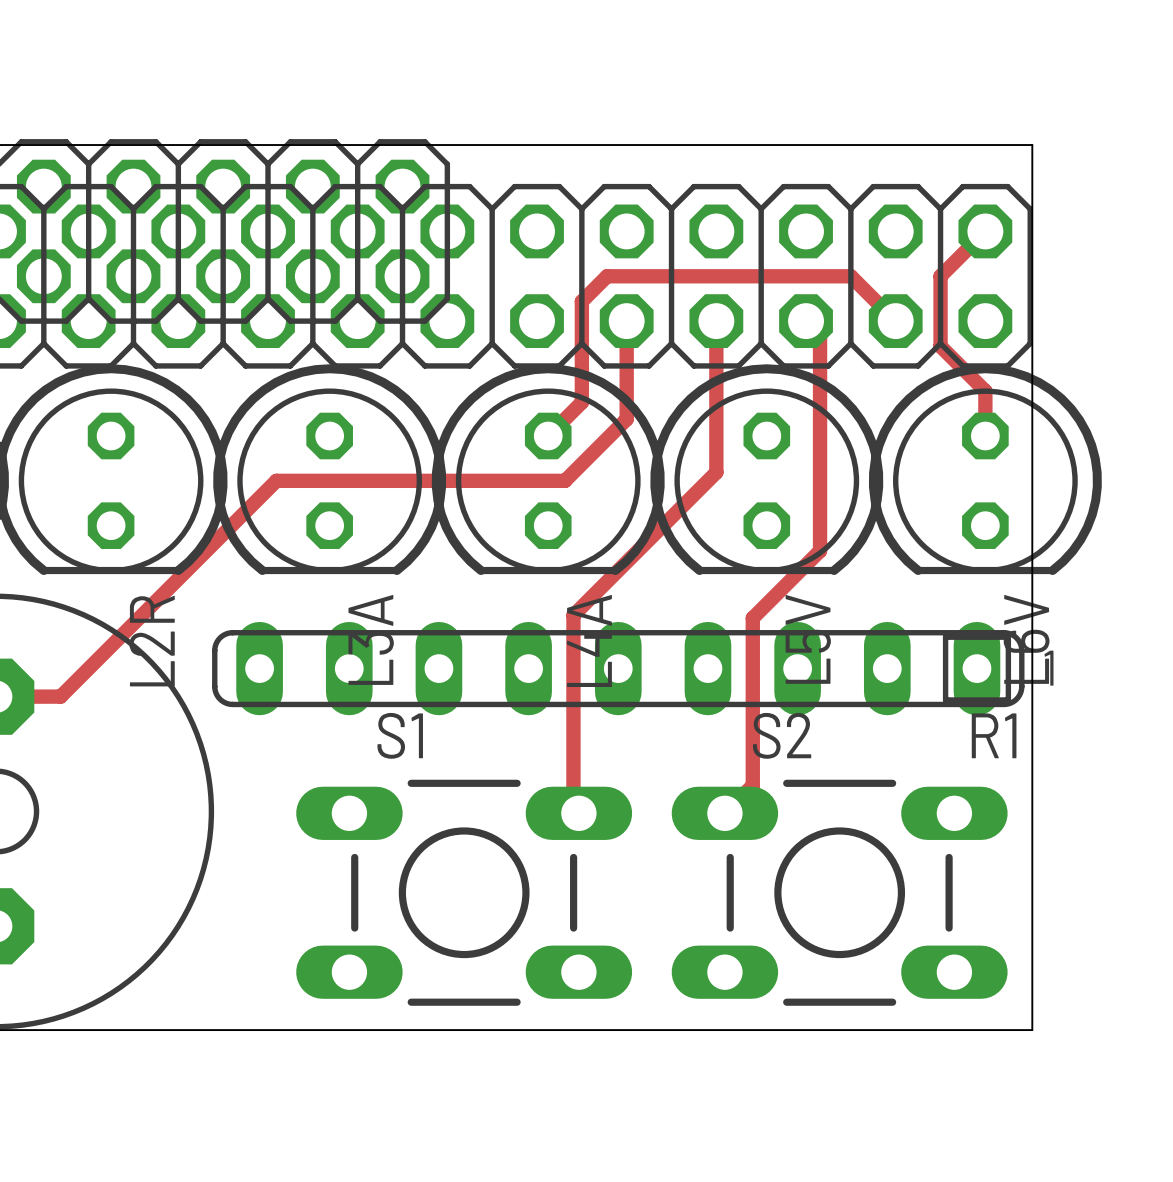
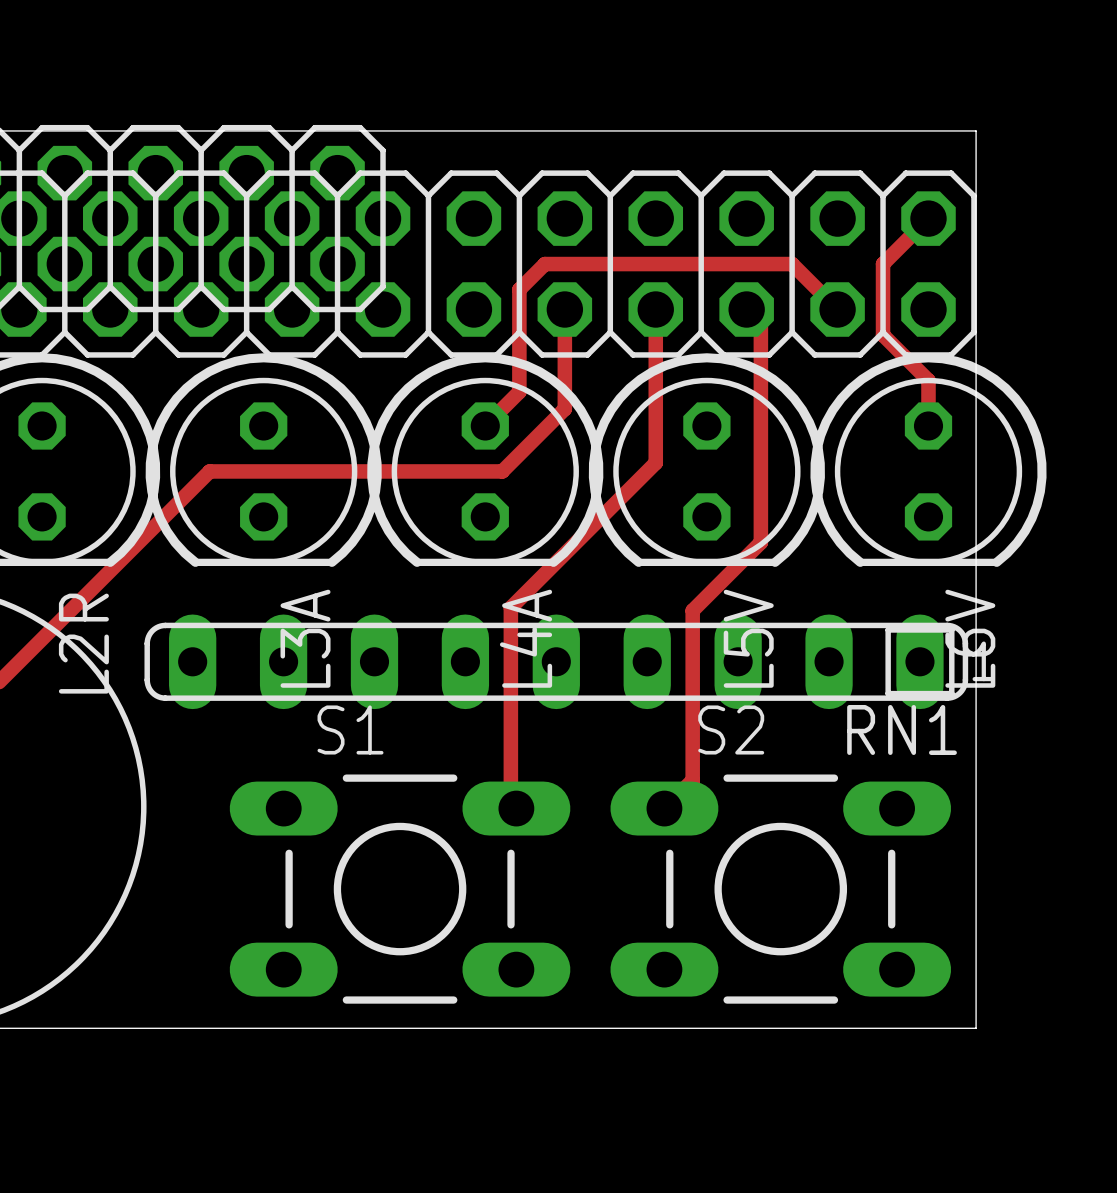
R1 name: R1 (994, 735) -> RN1 (902, 729)

